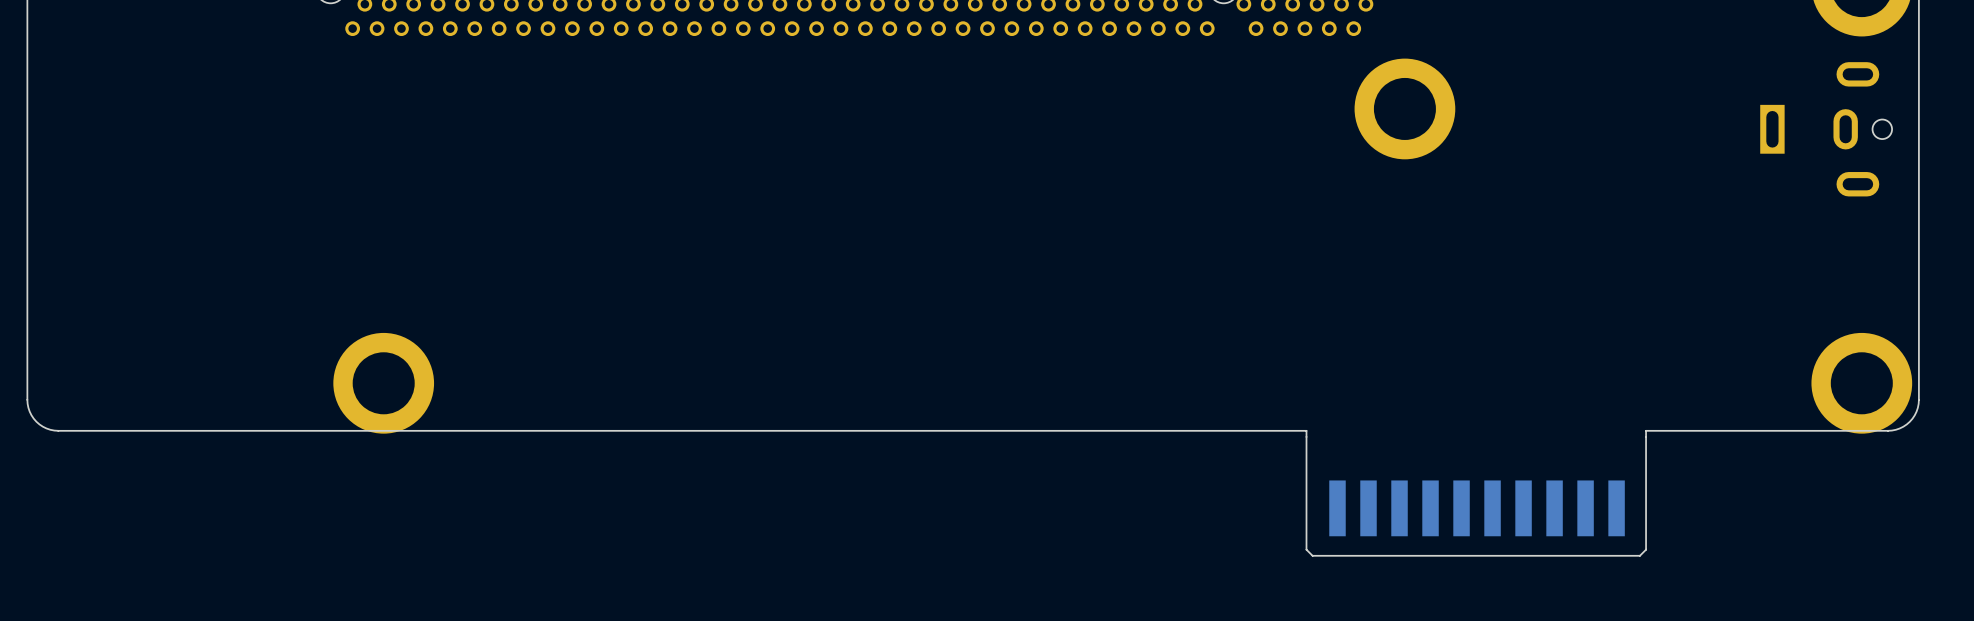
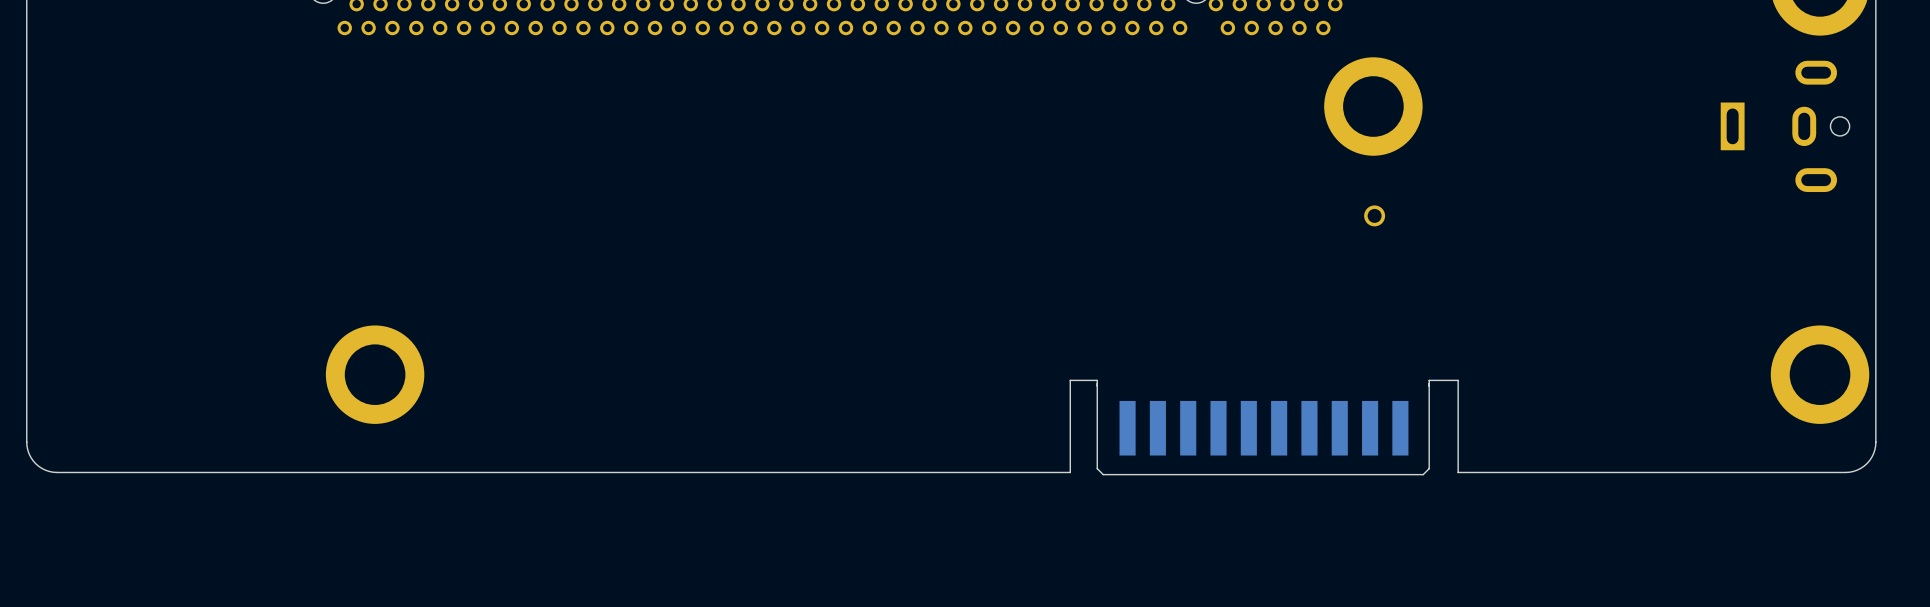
part: none -> (1374, 215)
board edge: (27, 399) (29, 411) (36, 421) (46, 428) (58, 430) (1306, 430) (1306, 436) -> (26, 390) (27, 450) (30, 457) (38, 466) (53, 472) (1070, 472) (1070, 380) (1097, 380) (1097, 386)
board edge: (1918, 399) (1916, 411) (1909, 421) (1903, 426) (1891, 430) (1646, 430) (1646, 436) -> (1875, 390) (1874, 450) (1866, 463) (1860, 468) (1849, 472) (1458, 472) (1458, 380) (1429, 380) (1429, 386)
part: none -> (1263, 429)
part: (1476, 496) -> none

